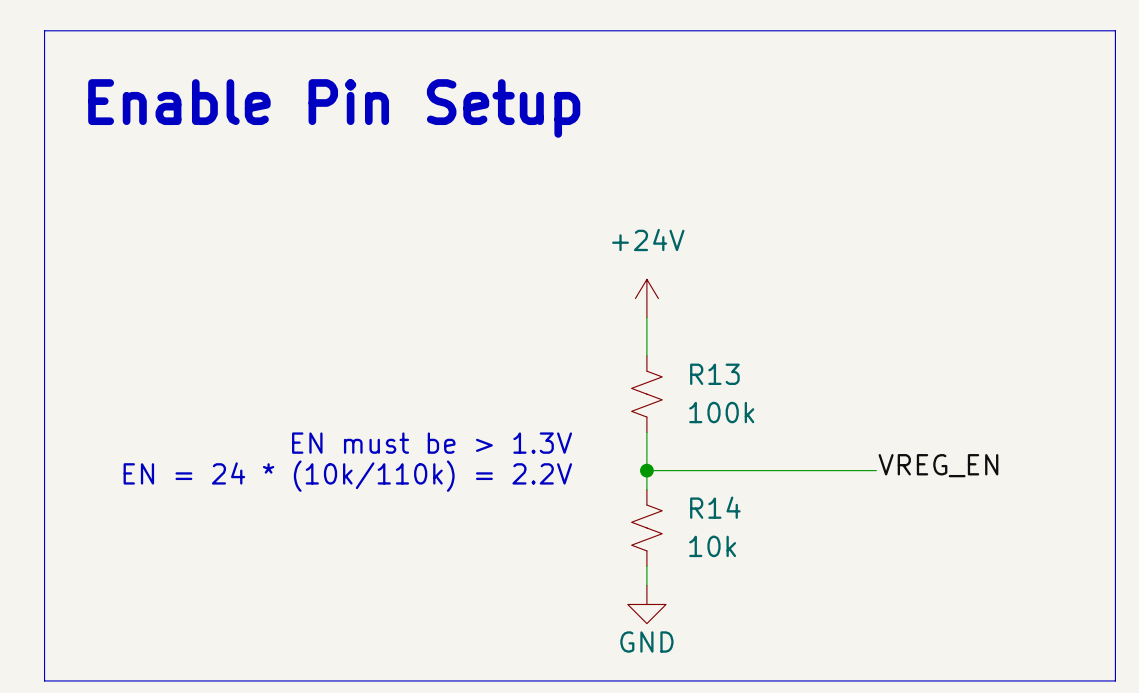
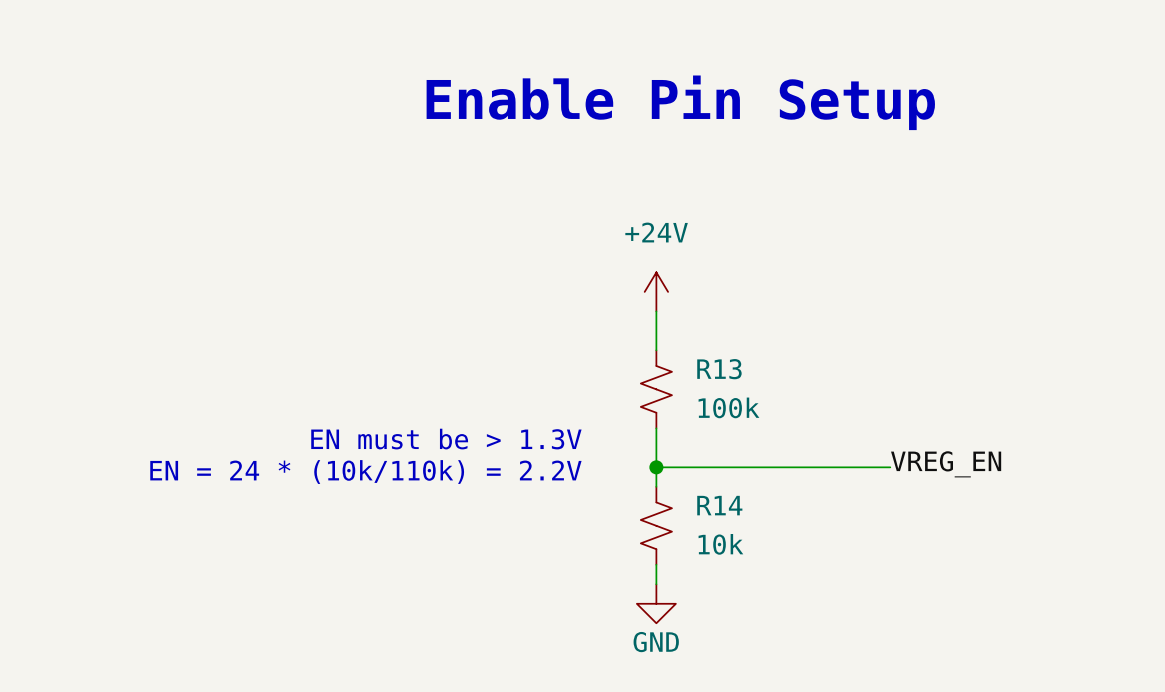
line: (44, 30) (1115, 30) (1115, 680) (44, 680) (44, 30) -> none
text position: Enable Pin Setup (334, 108) -> Enable Pin Setup (680, 102)

